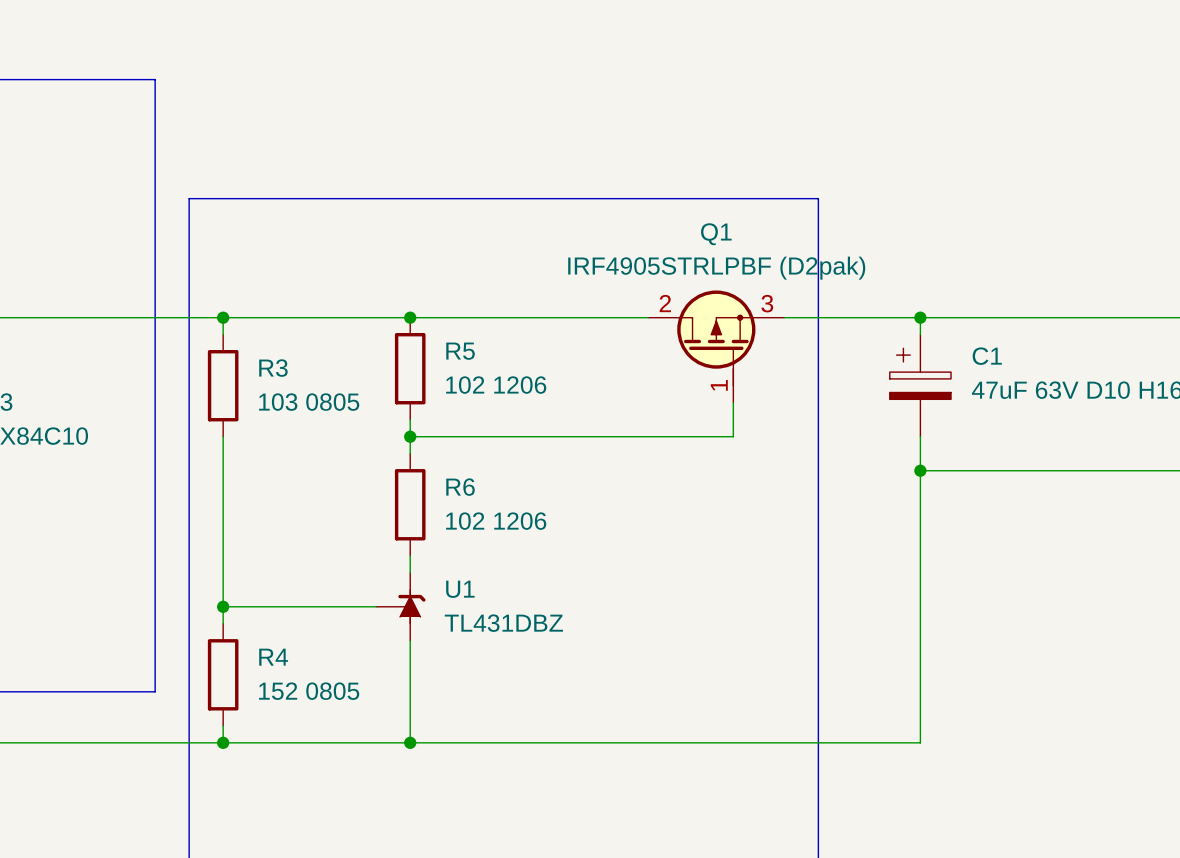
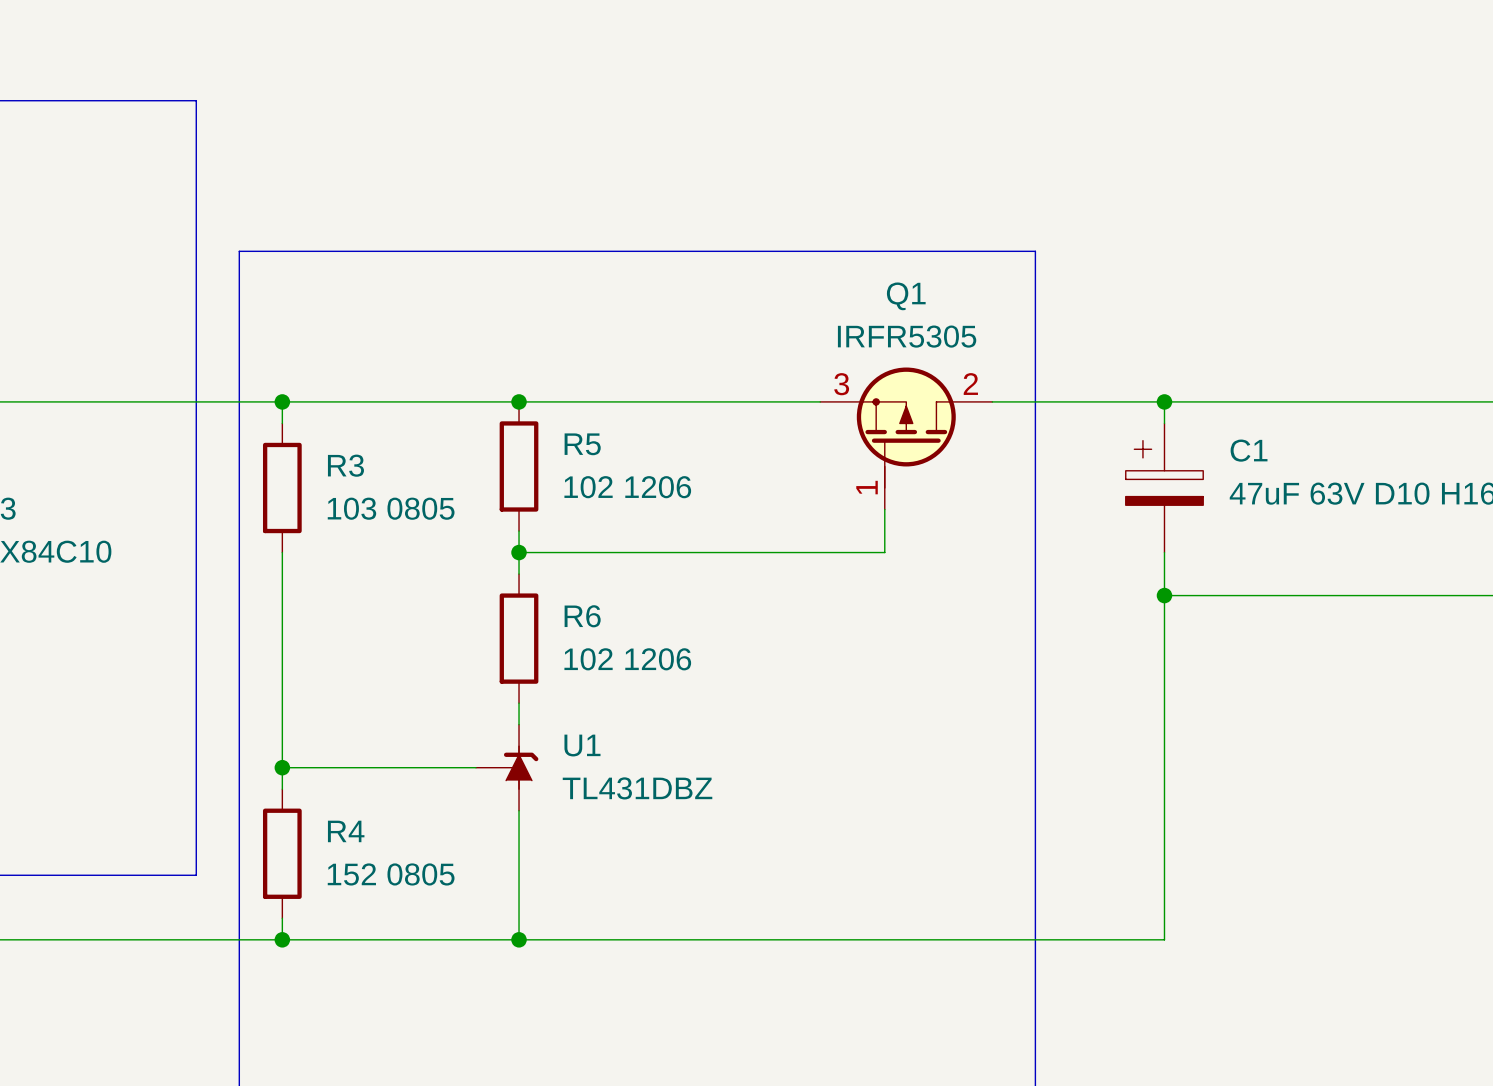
Q1 value: IRF4905STRLPBF (D2pak) (716, 268) -> IRFR5305 (907, 336)
Q1 flip: as is (716, 338) -> left-right (906, 427)
wire: (733, 402) (733, 436) (699, 436) -> (884, 509) (884, 552)

